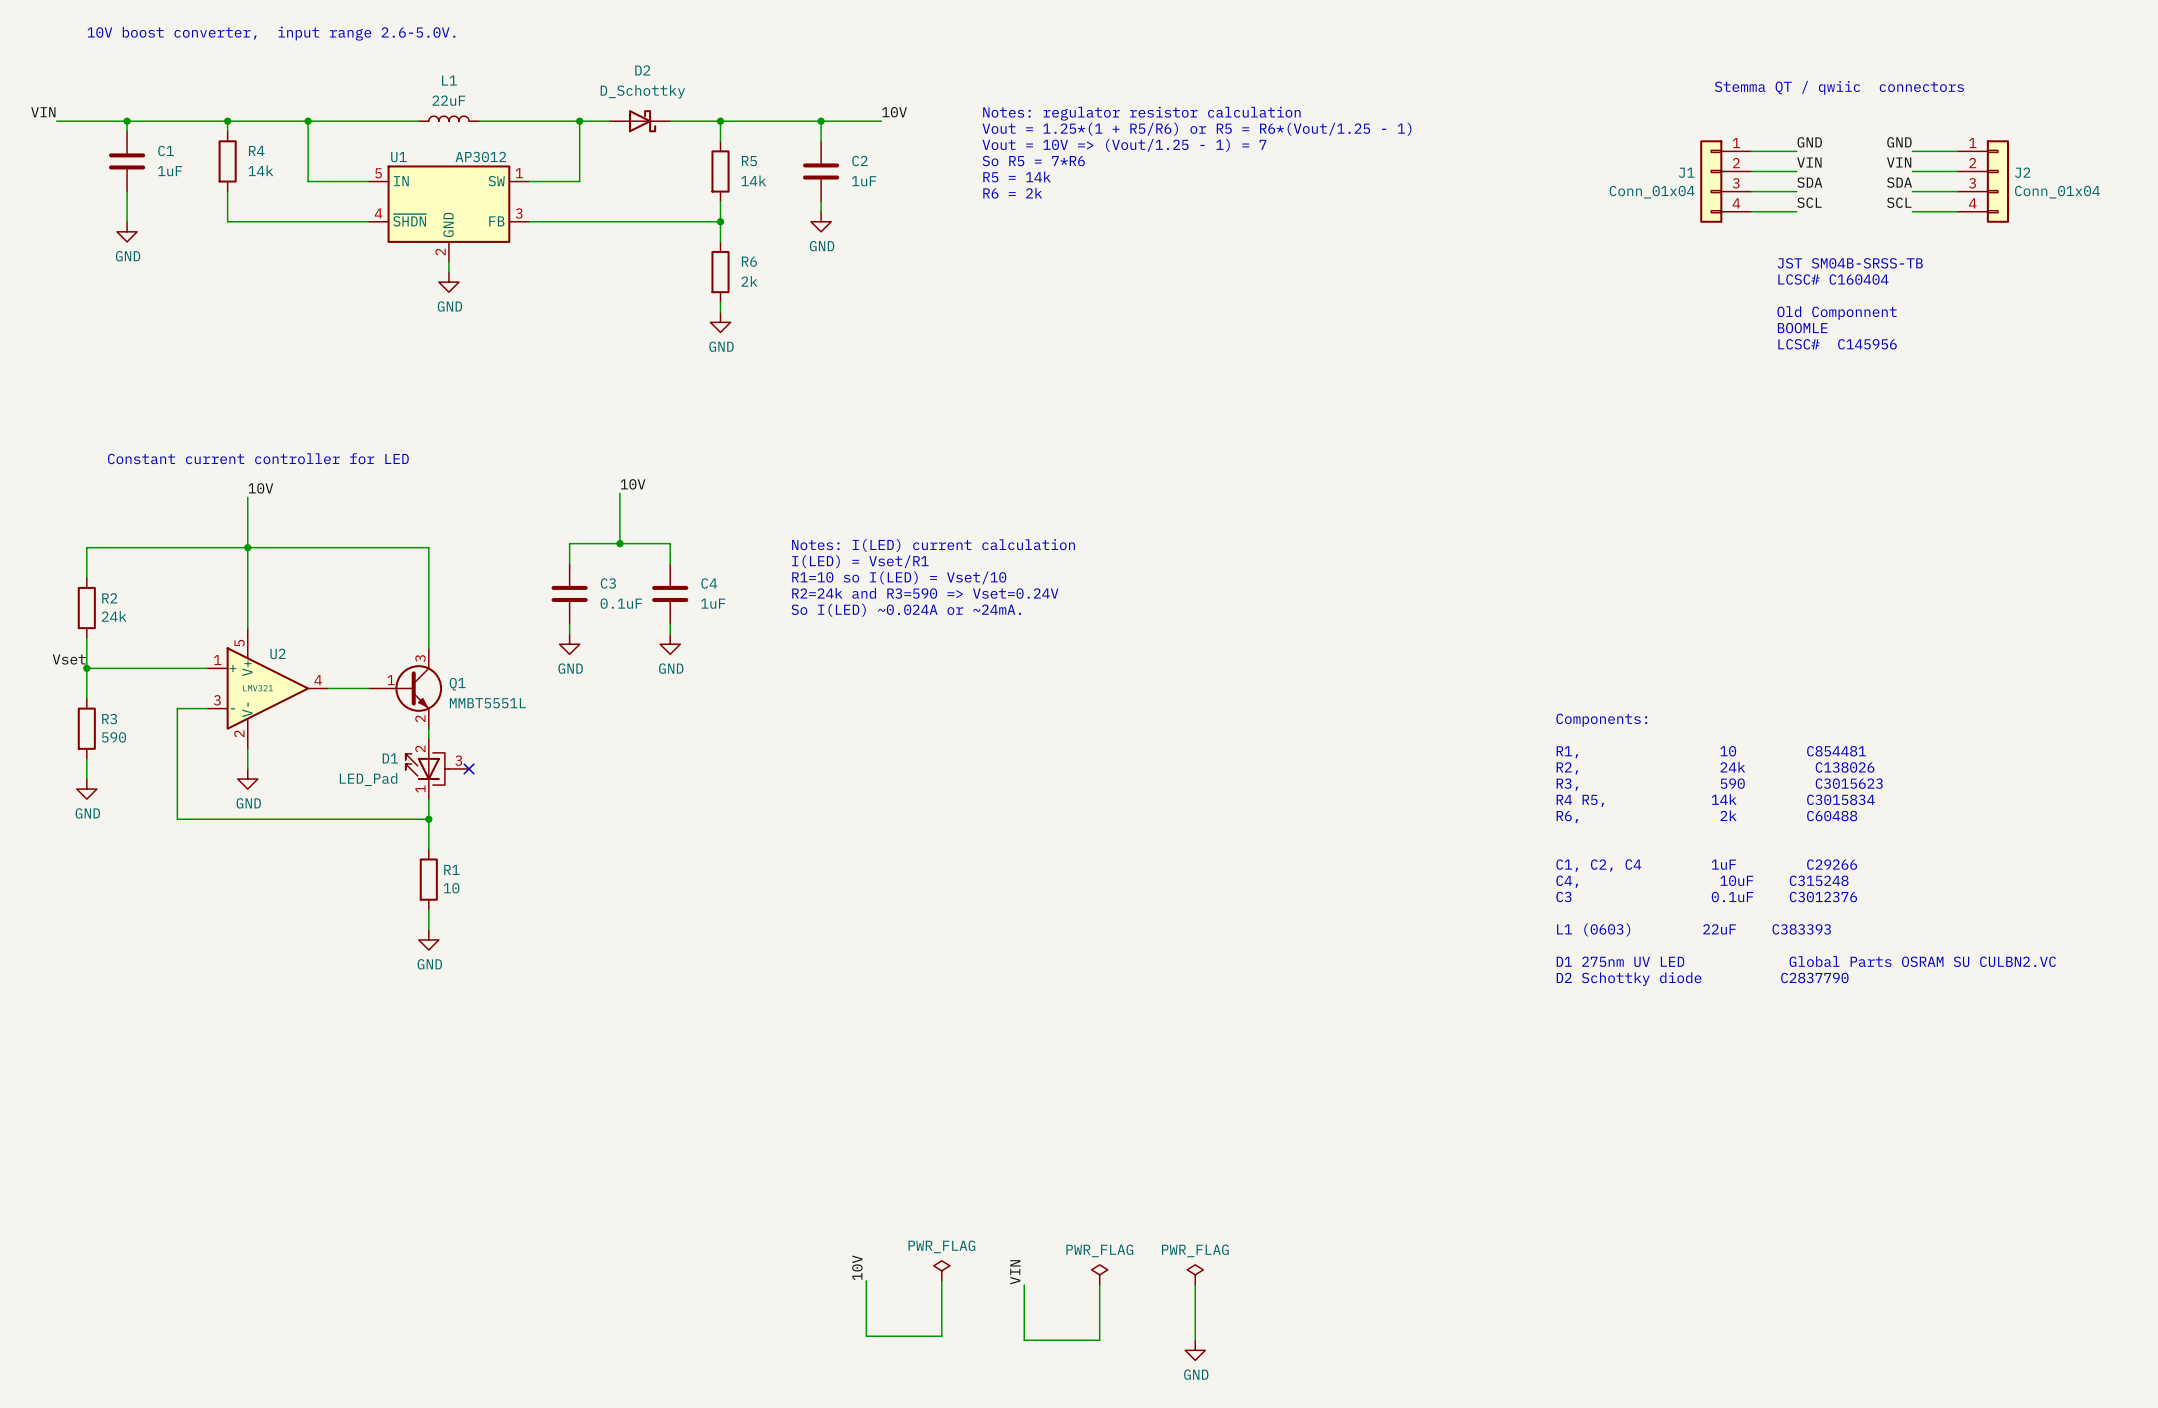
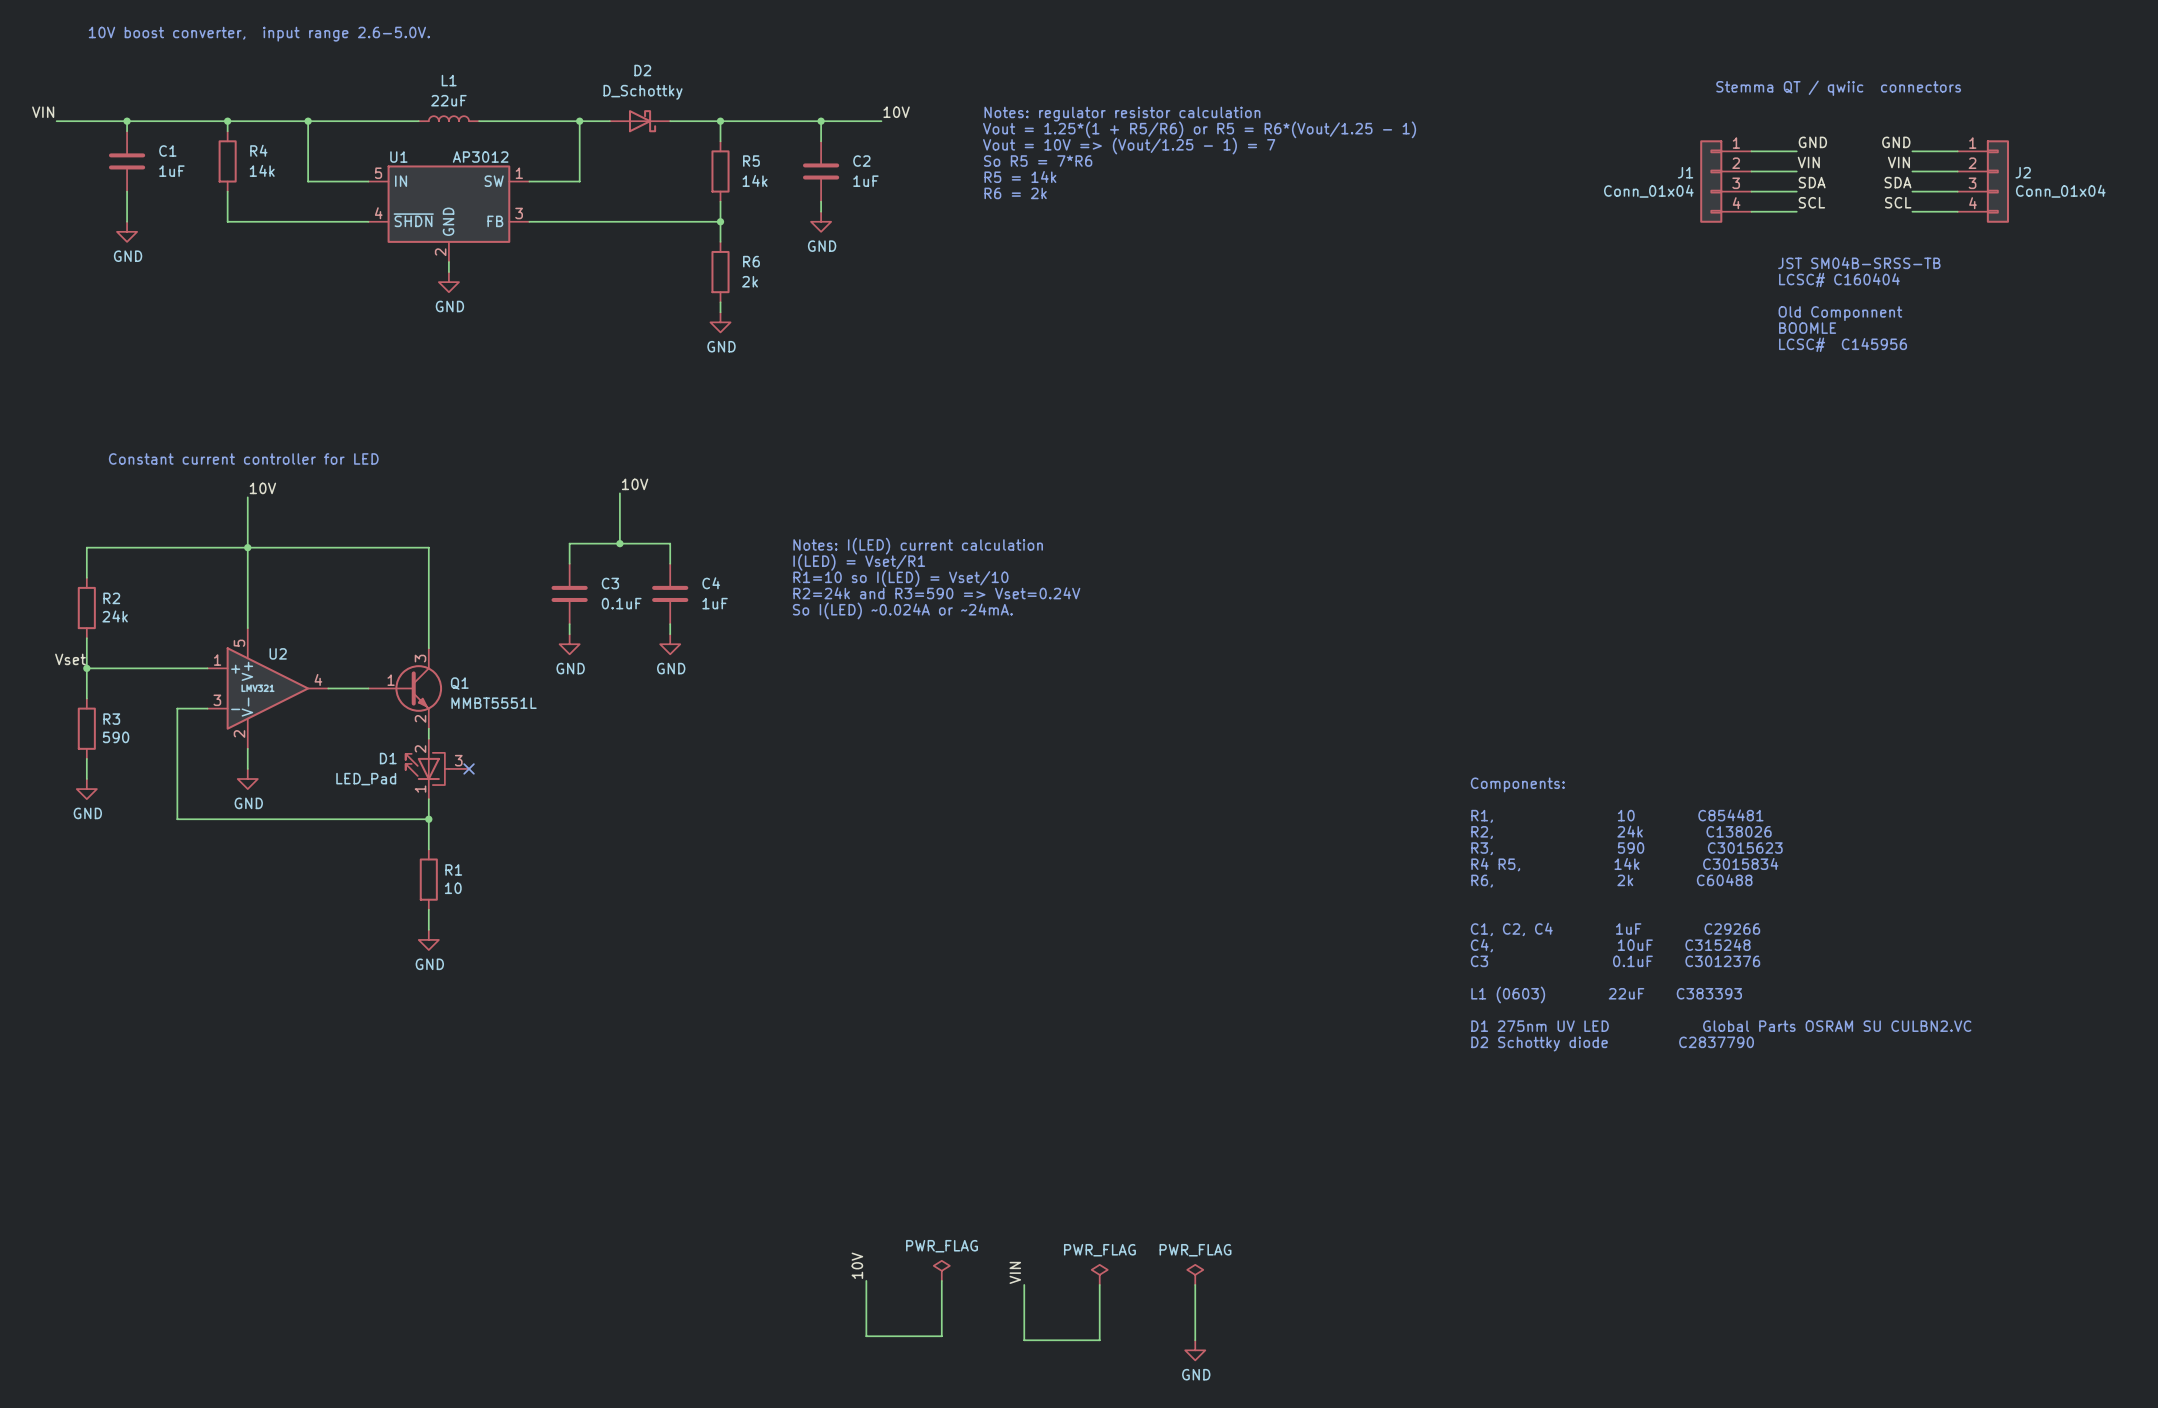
text position: Components: (1601, 720) -> Components: (1517, 784)
text position: R1, 10 C854481 (1711, 752) -> R1, 10 C854481 (1617, 816)
text position: R2, 24k C138026 (1715, 768) -> R2, 24k C138026 (1621, 832)
text position: R3, 590 C3015623 (1719, 784) -> R3, 590 C3015623 (1626, 848)
text position: R4 R5, 14k C3015834 (1715, 800) -> R4 R5, 14k C3015834 (1624, 864)
text position: R6, 2k C60488 (1706, 816) -> R6, 2k C60488 (1611, 880)
text position: C1, C2, C4 1uF C29266 (1706, 865) -> C1, C2, C4 1uF C29266 (1615, 929)
text position: C4, 10uF C315248 (1702, 881) -> C4, 10uF C315248 (1610, 945)
text position: C3 0.1uF C3012376 (1706, 897) -> C3 0.1uF C3012376 (1615, 961)
text position: L1 (0603) 22uF C383393 (1693, 929) -> L1 (0603) 22uF C383393 (1606, 994)
text position: D1 275nm UV LED Global Parts OSRAM SU CULBN2.VC (1806, 961) -> D1 275nm UV LED Global Parts OSRAM SU CULBN2.VC (1721, 1026)
text position: D2 Schottky diode C2837790 (1702, 979) -> D2 Schottky diode C2837790 (1612, 1044)

